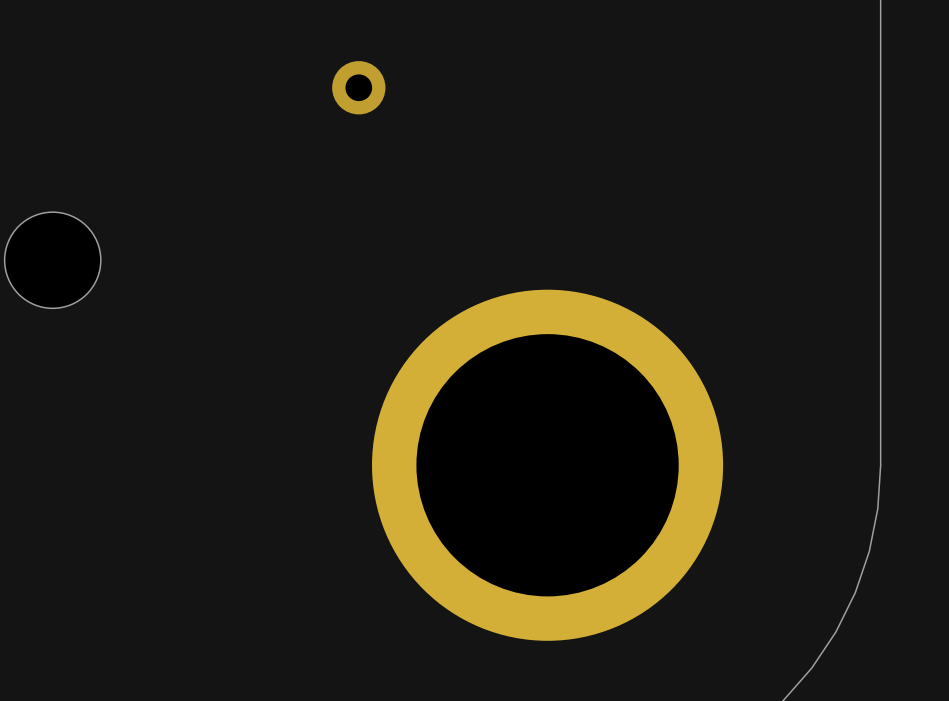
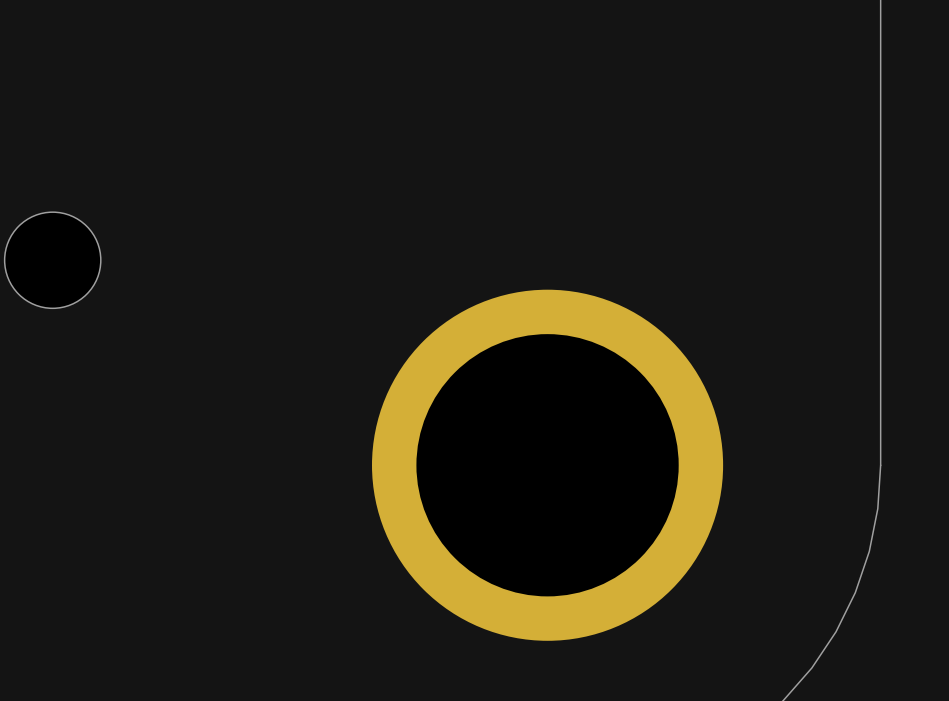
via: (358, 87) -> none

